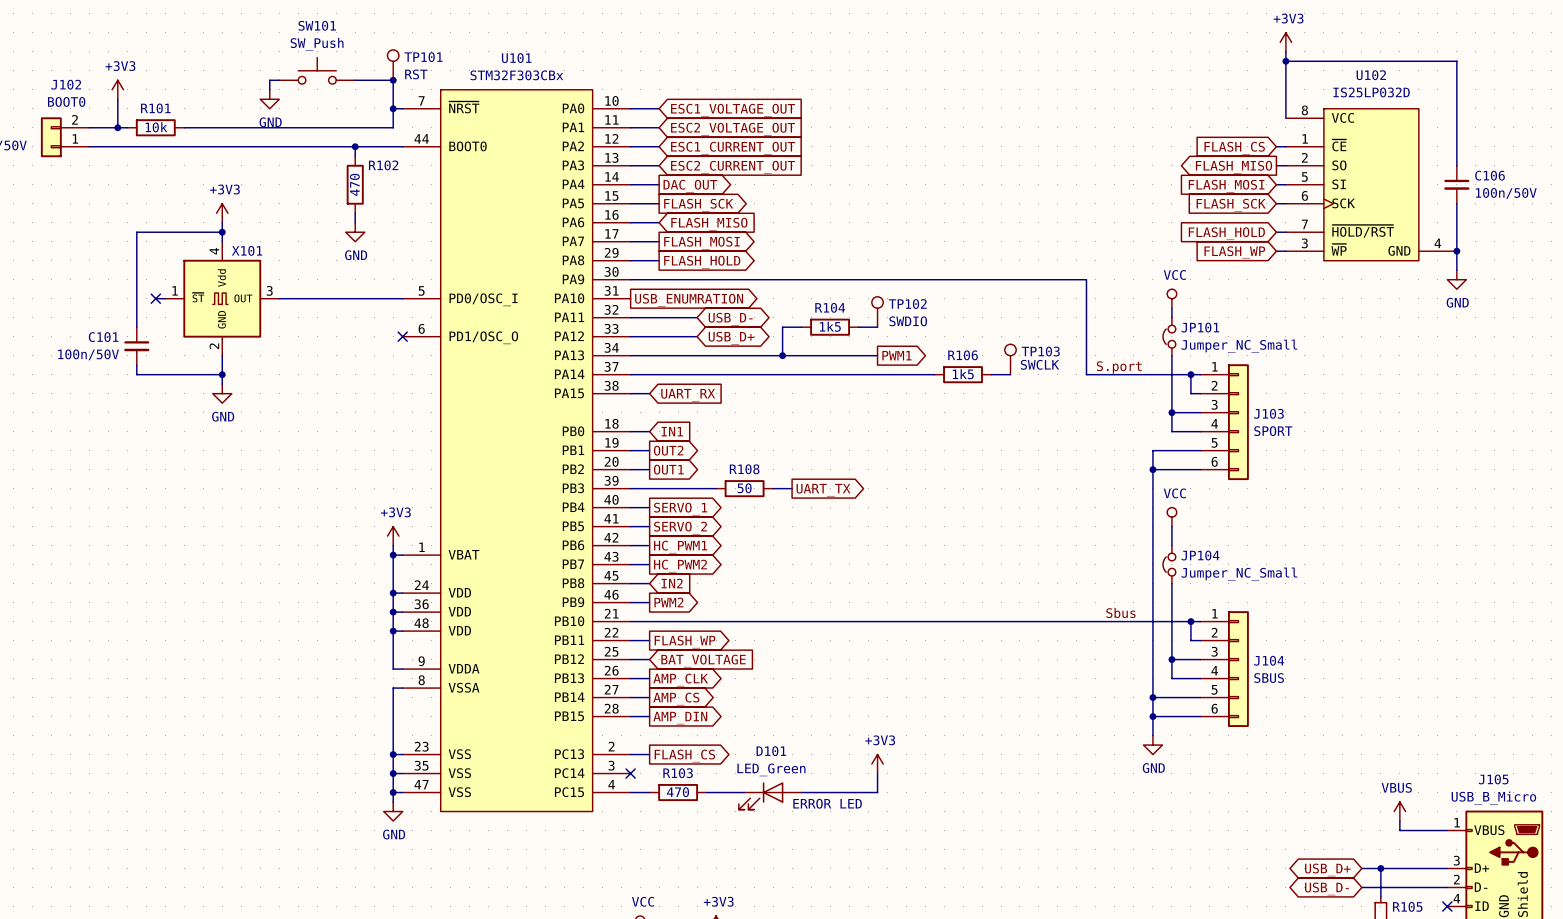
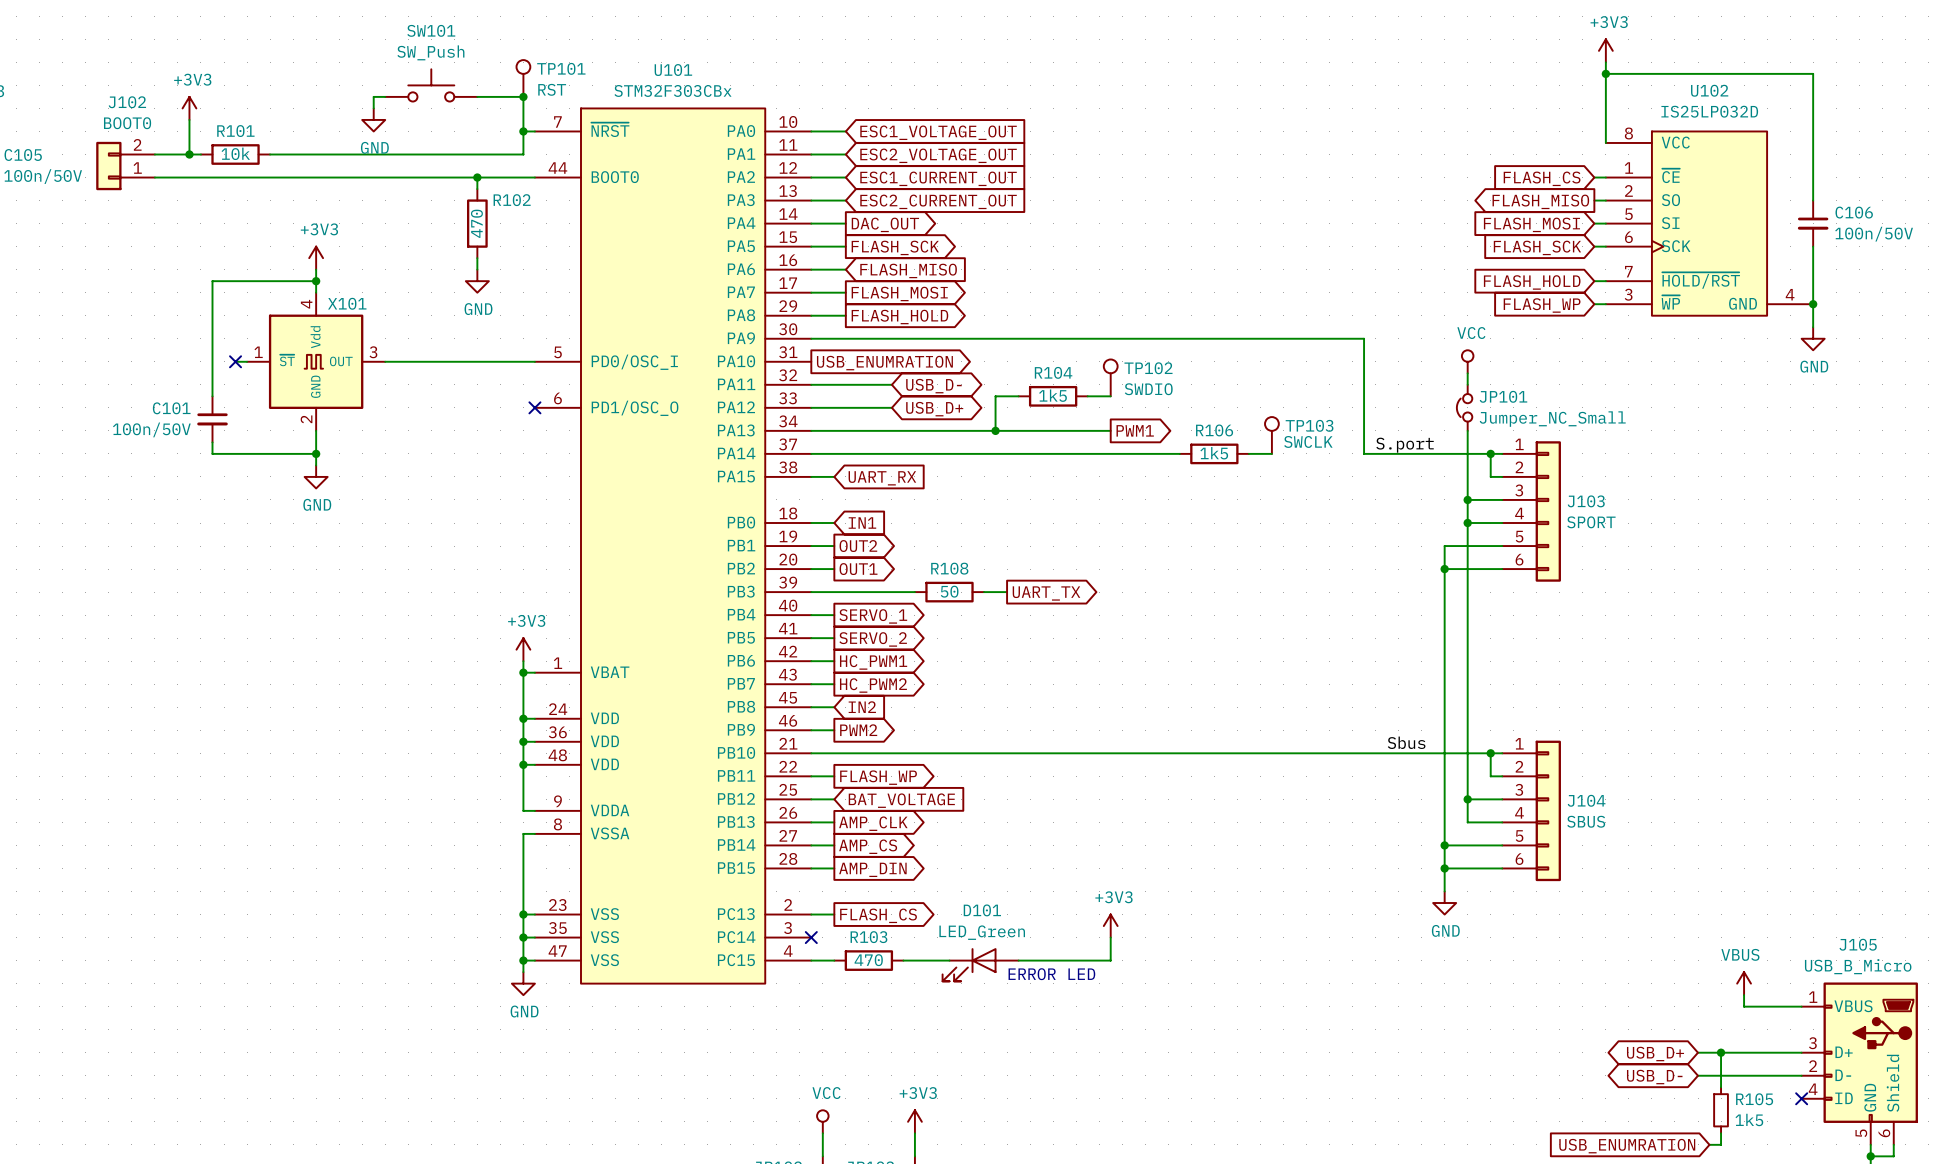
wire: none -> (1467, 523) (1467, 638)
junction: none -> (1467, 523)
power symbol: VCC (1171, 517) -> none
JP104: Jumper_NC_Small (1169, 564) -> none

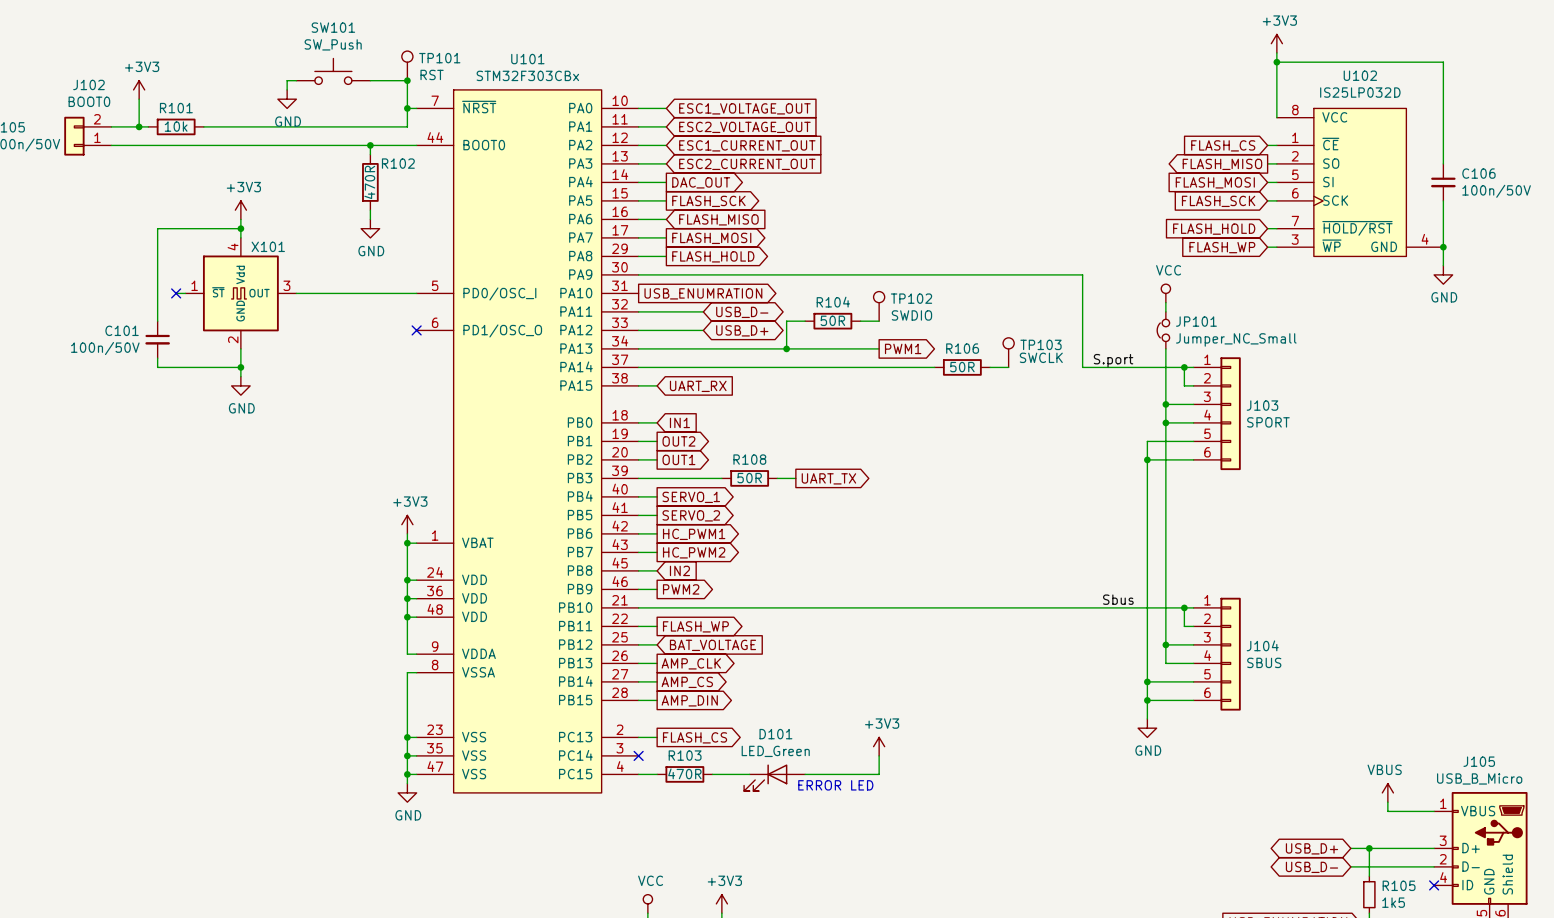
R102 value: 470 (476, 223) -> 470R (369, 182)
R104 value: 1k5 (1053, 395) -> 50R (832, 320)
R106 value: 1k5 (1214, 453) -> 50R (962, 367)
R108 value: 50 (949, 591) -> 50R (749, 478)
R103 value: 470 (868, 960) -> 470R (684, 773)

